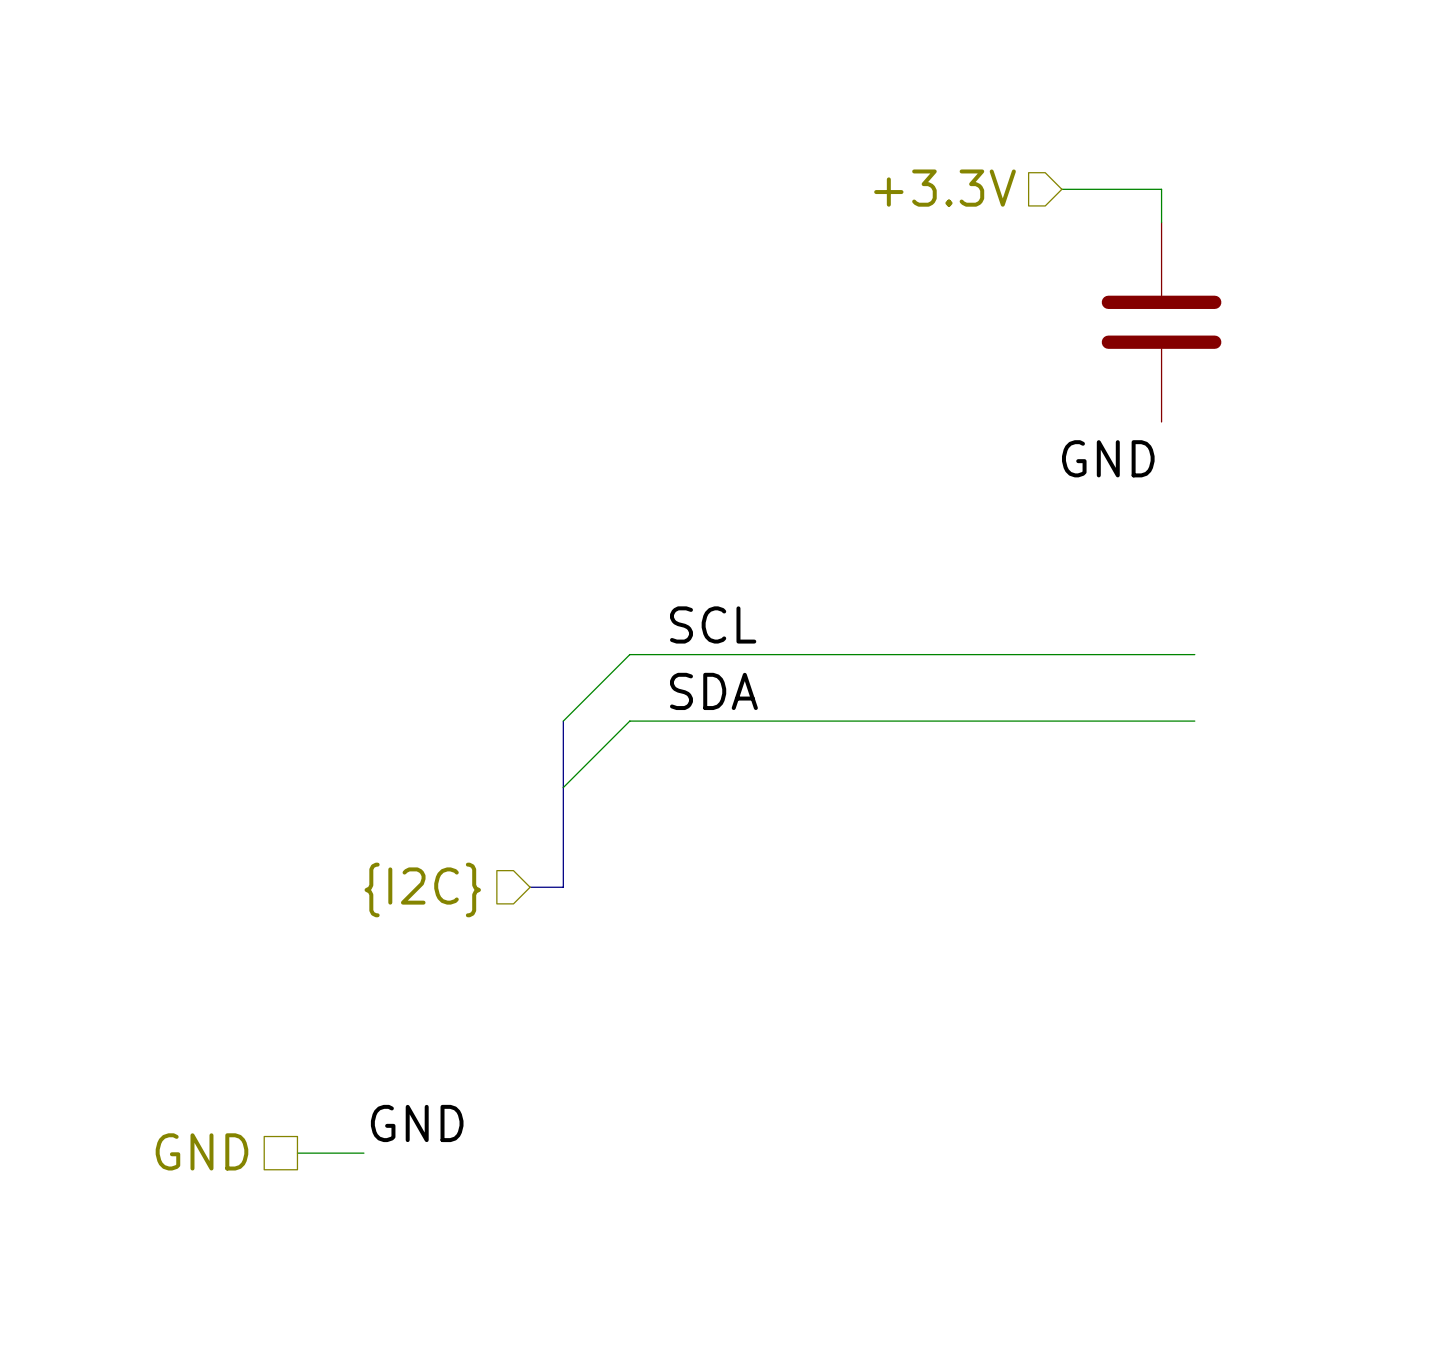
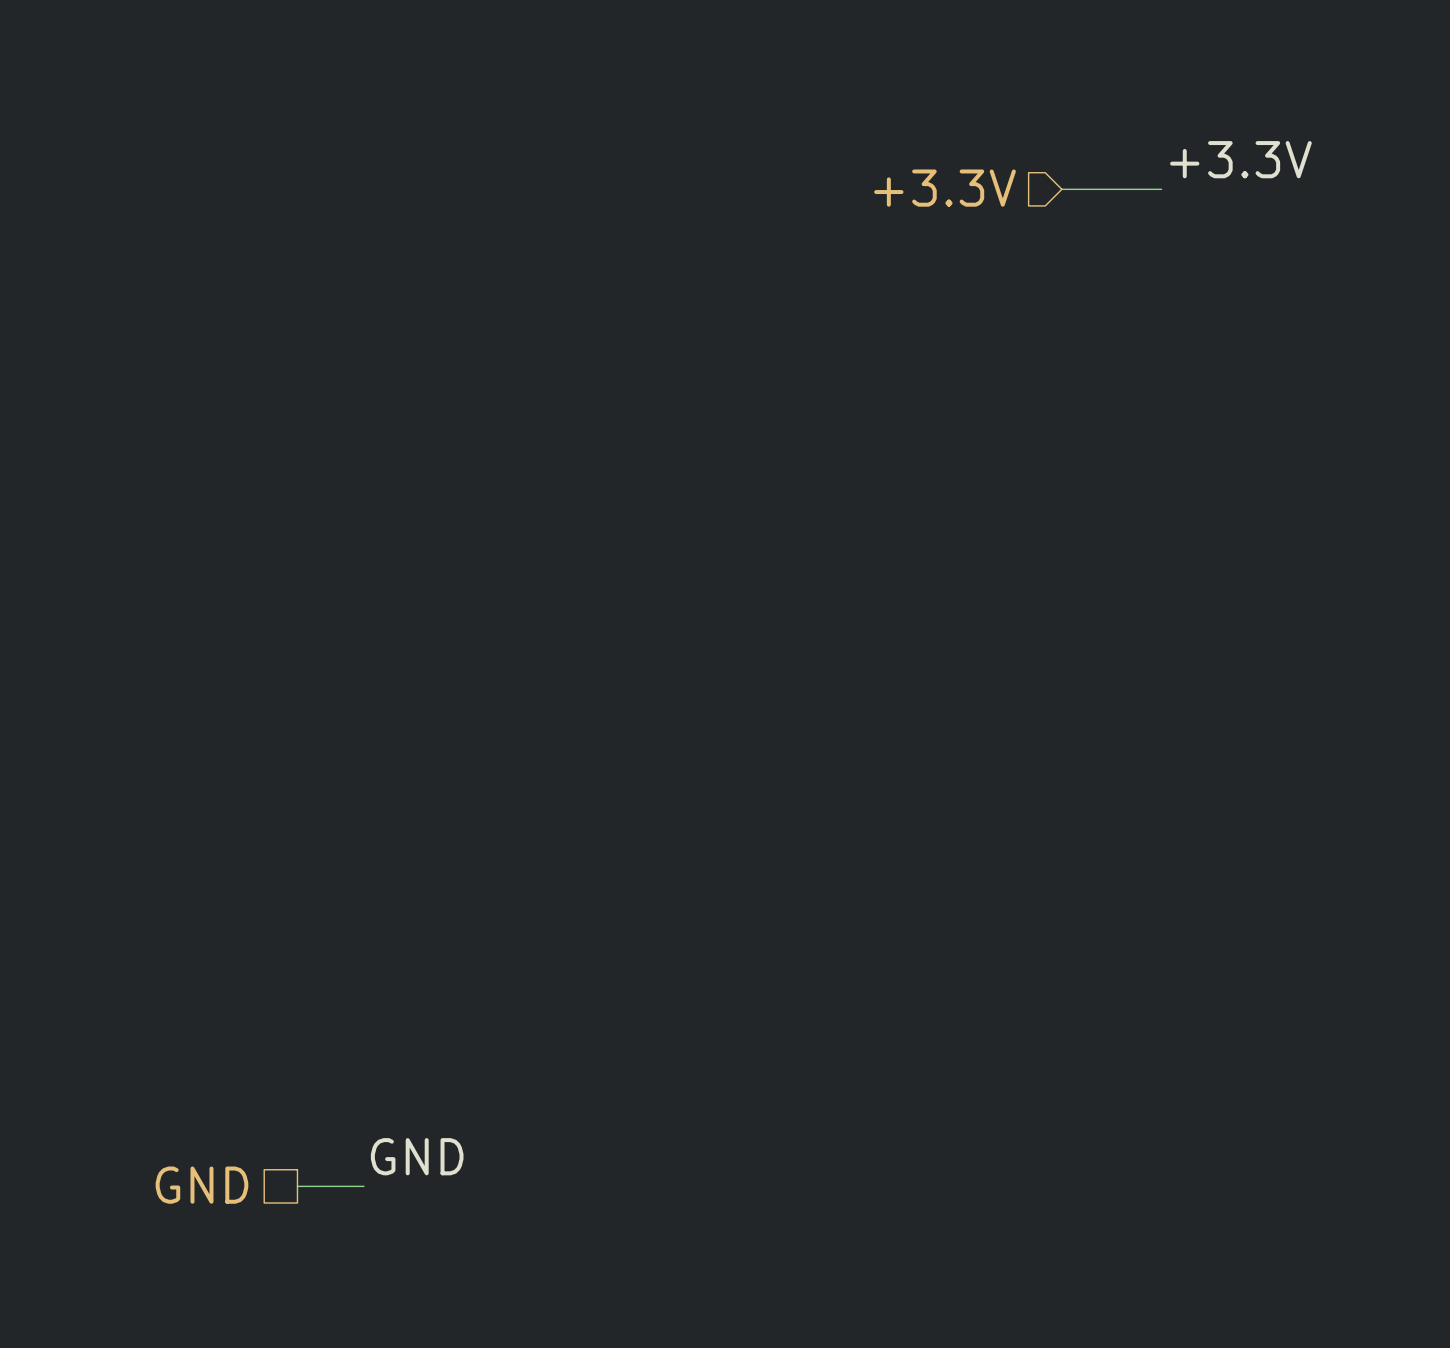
label: none -> +3.3V (1240, 159)
wire: (1161, 189) (1161, 222) -> none
part: (1161, 322) -> none
label: GND (1108, 458) -> none
label: SCL (713, 624) -> none
wire: (1194, 654) (629, 654) (563, 721) -> none
label: SDA (713, 691) -> none
bus: (563, 721) (563, 887) (530, 887) -> none
wire: (1194, 721) (629, 721) (563, 787) -> none
hierarchical label: {I2C} (422, 889) -> none
label position: GND (417, 1123) -> GND (417, 1156)
hierarchical label position: GND (201, 1151) -> GND (201, 1185)
wire: (297, 1153) (363, 1153) -> (297, 1186) (363, 1186)

